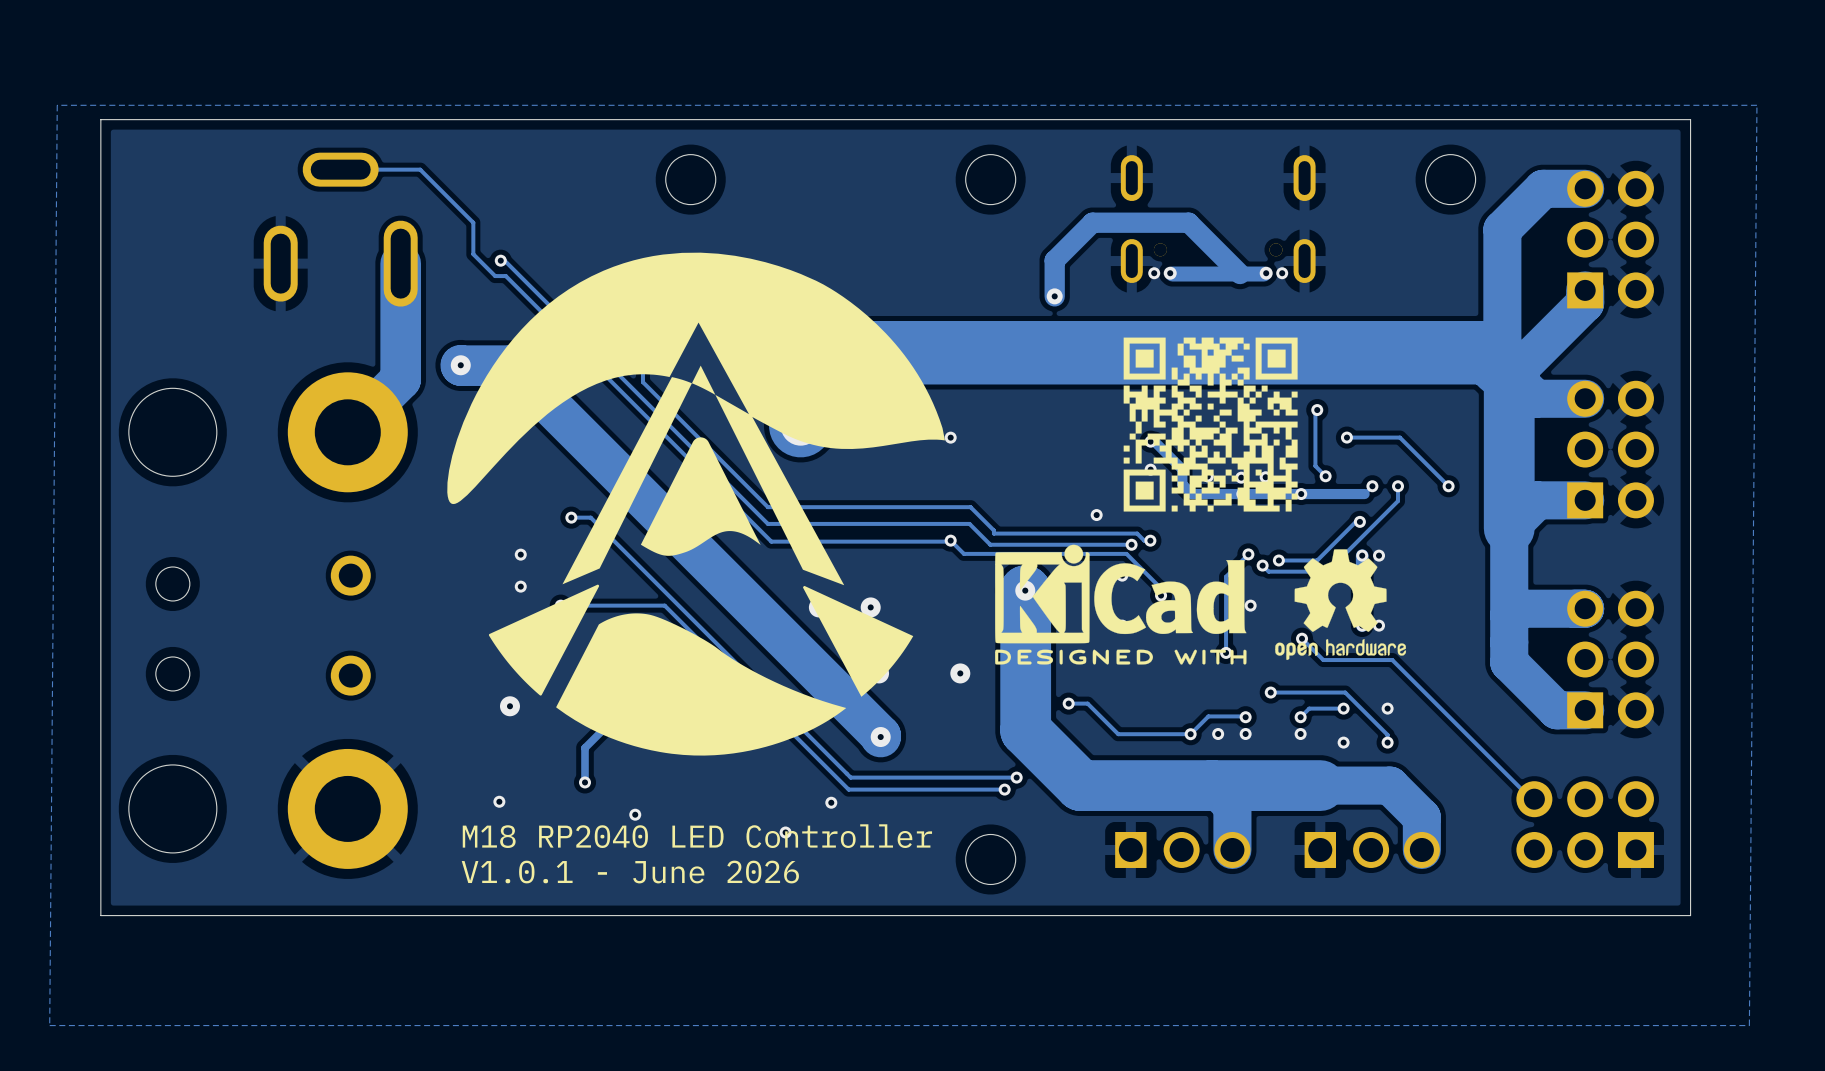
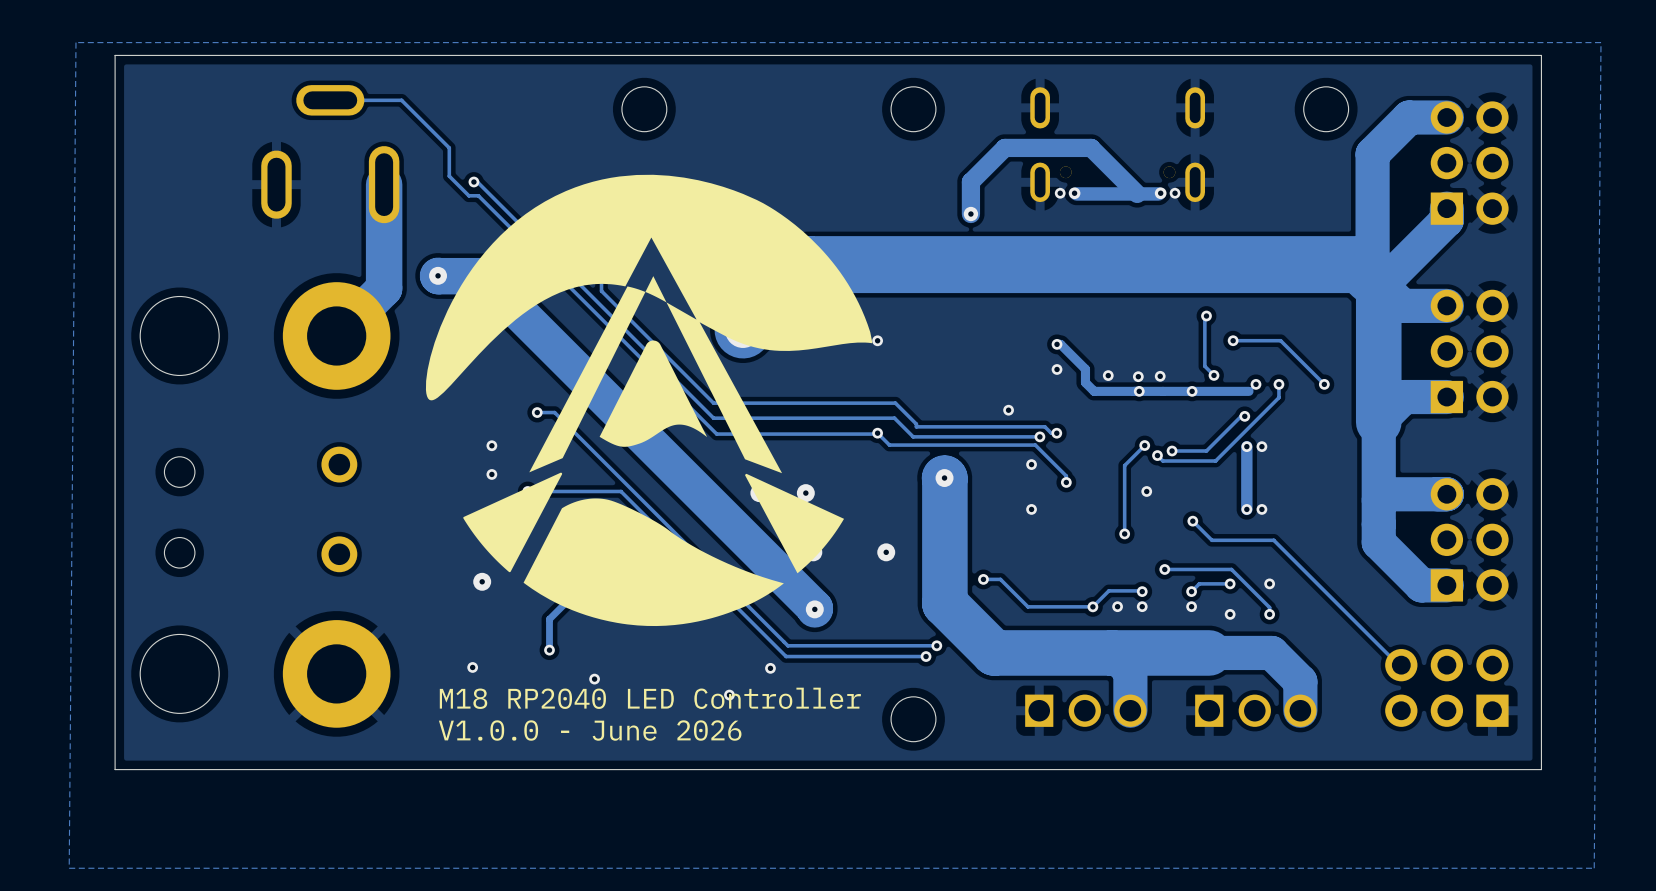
drawing: [1123, 337, 1298, 512] -> none
drawing: [995, 544, 1247, 665] -> none
drawing: [1275, 549, 1407, 661] -> none
text: V1.0.1 - June 2026 (630, 872) -> V1.0.0 - June 2026 (590, 730)

